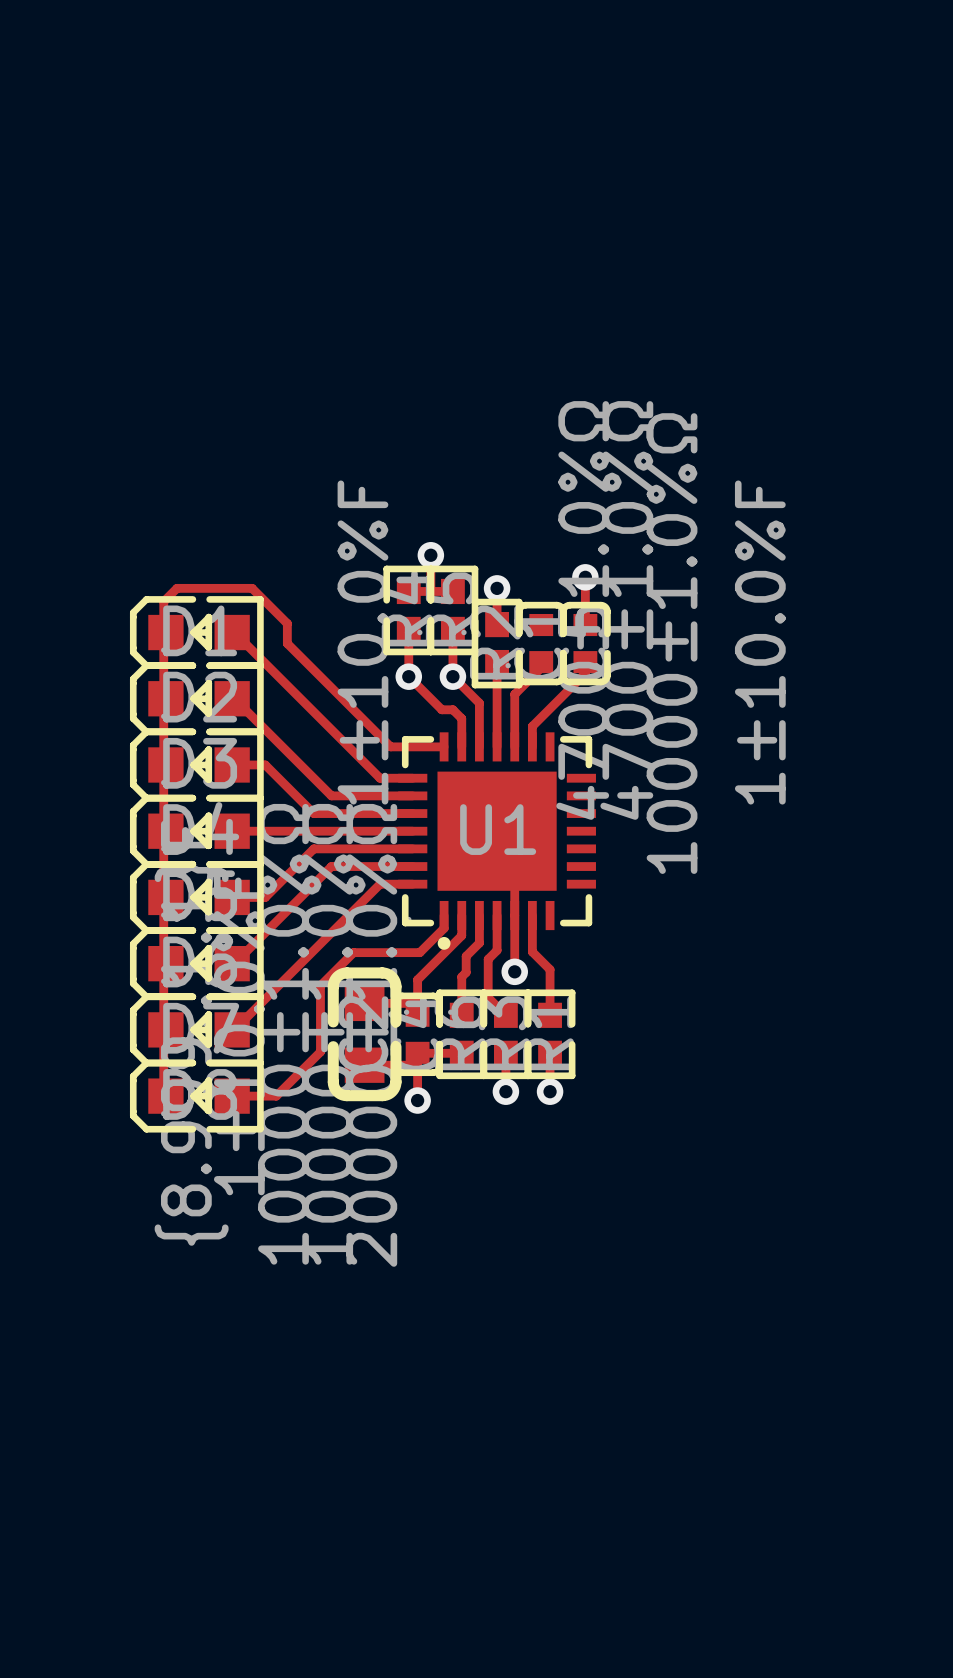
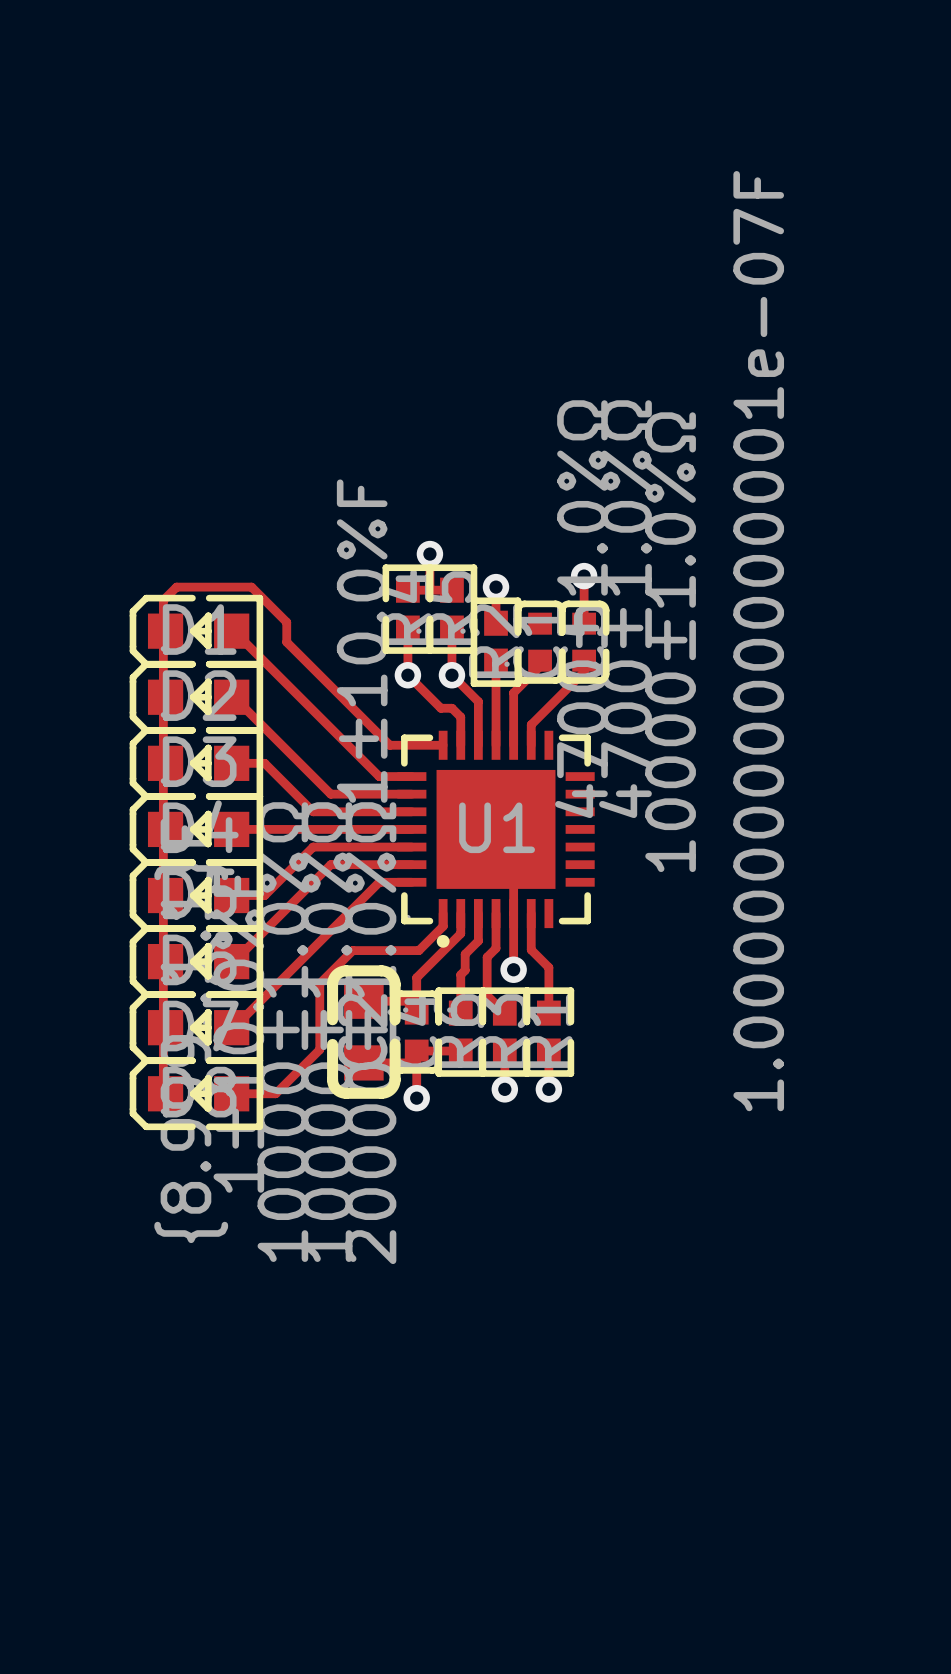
part value: 1±10.0%F (760, 642) -> 1.0000000000000001e-07F (758, 641)

